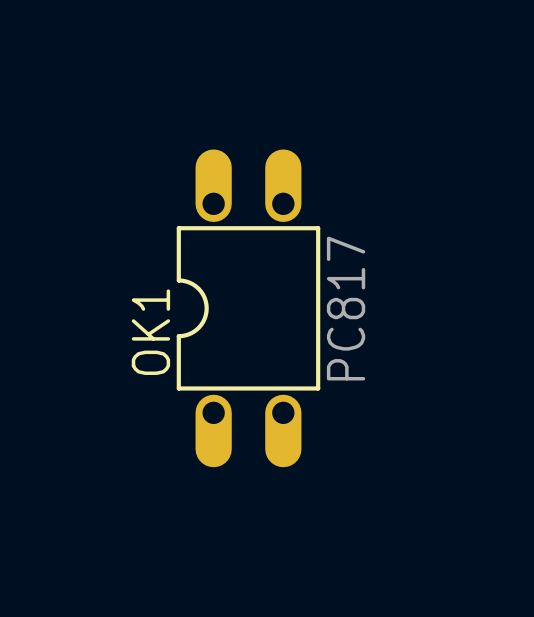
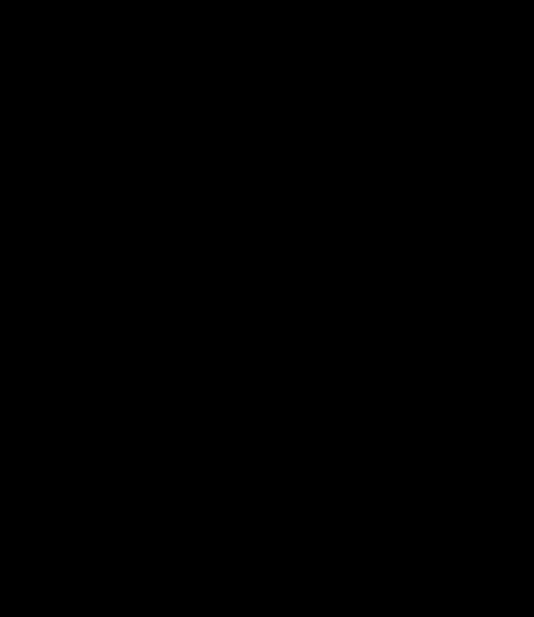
OK1: PC817 (248, 308) -> none

